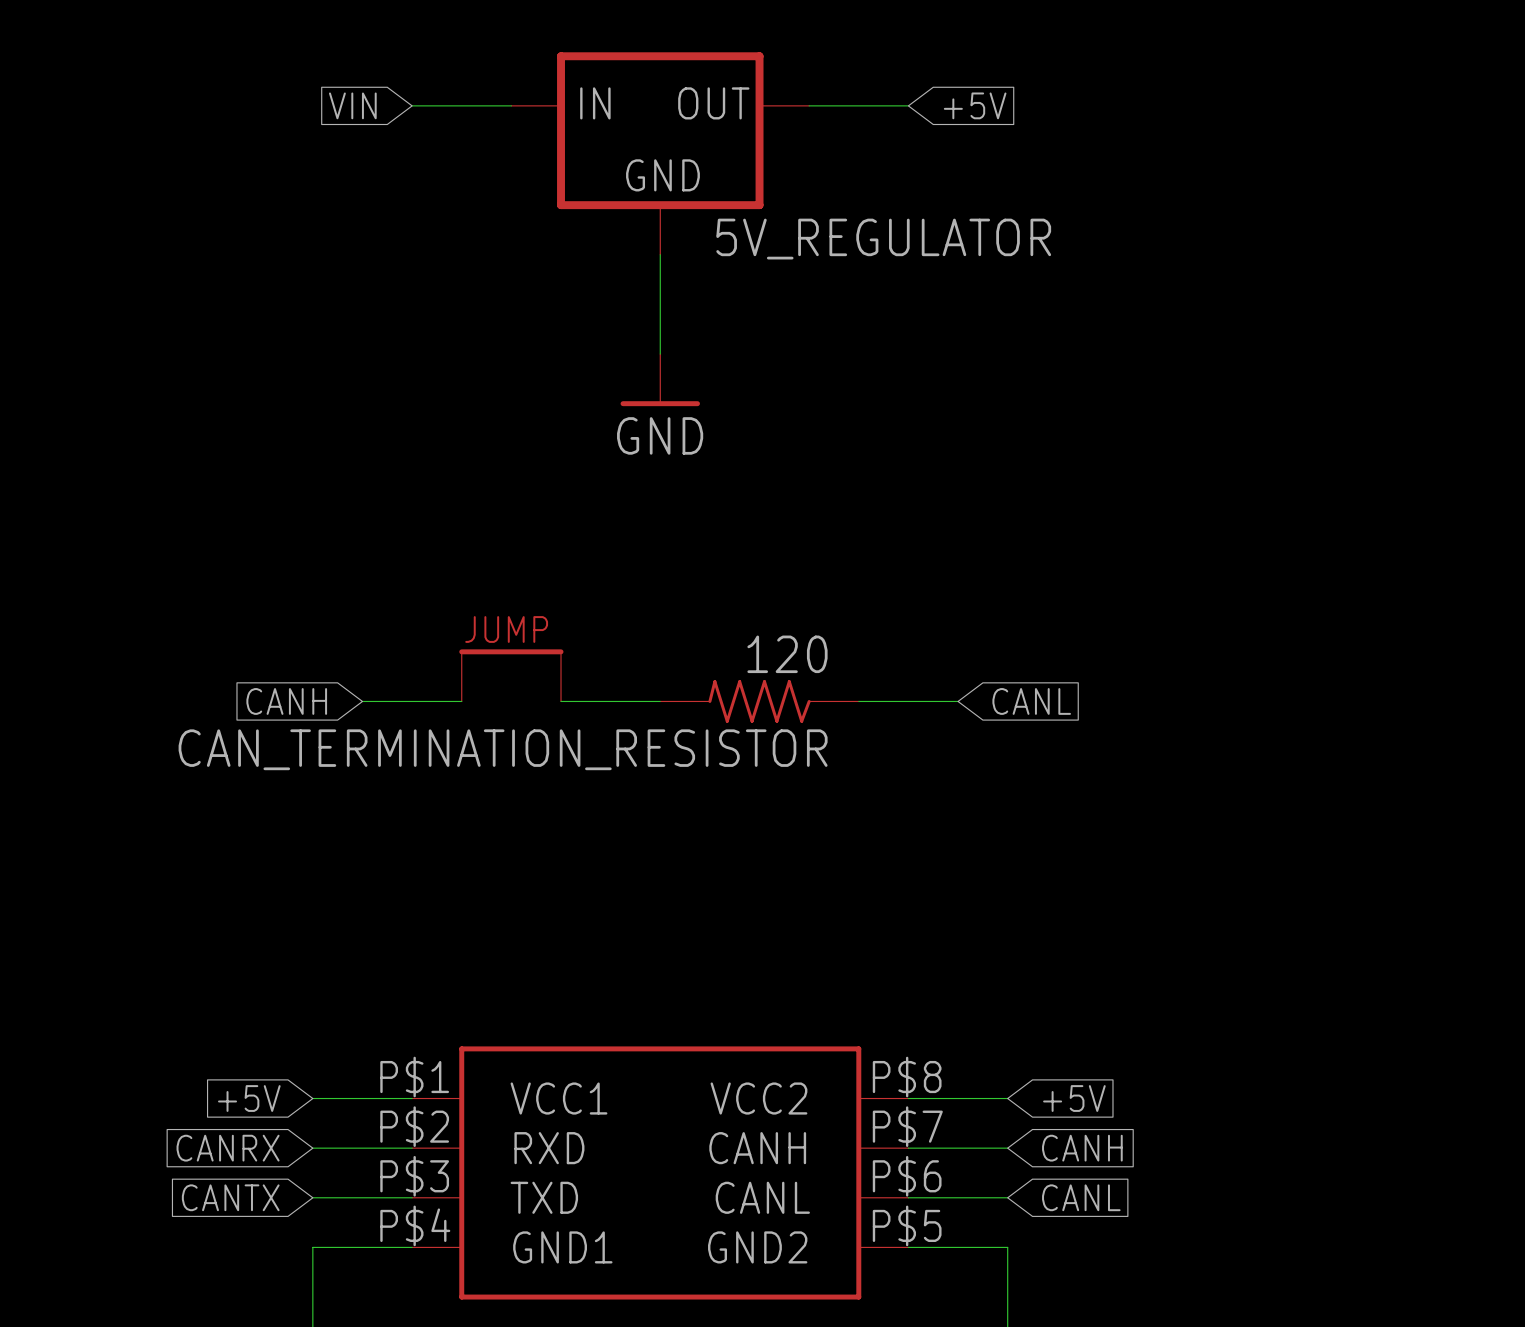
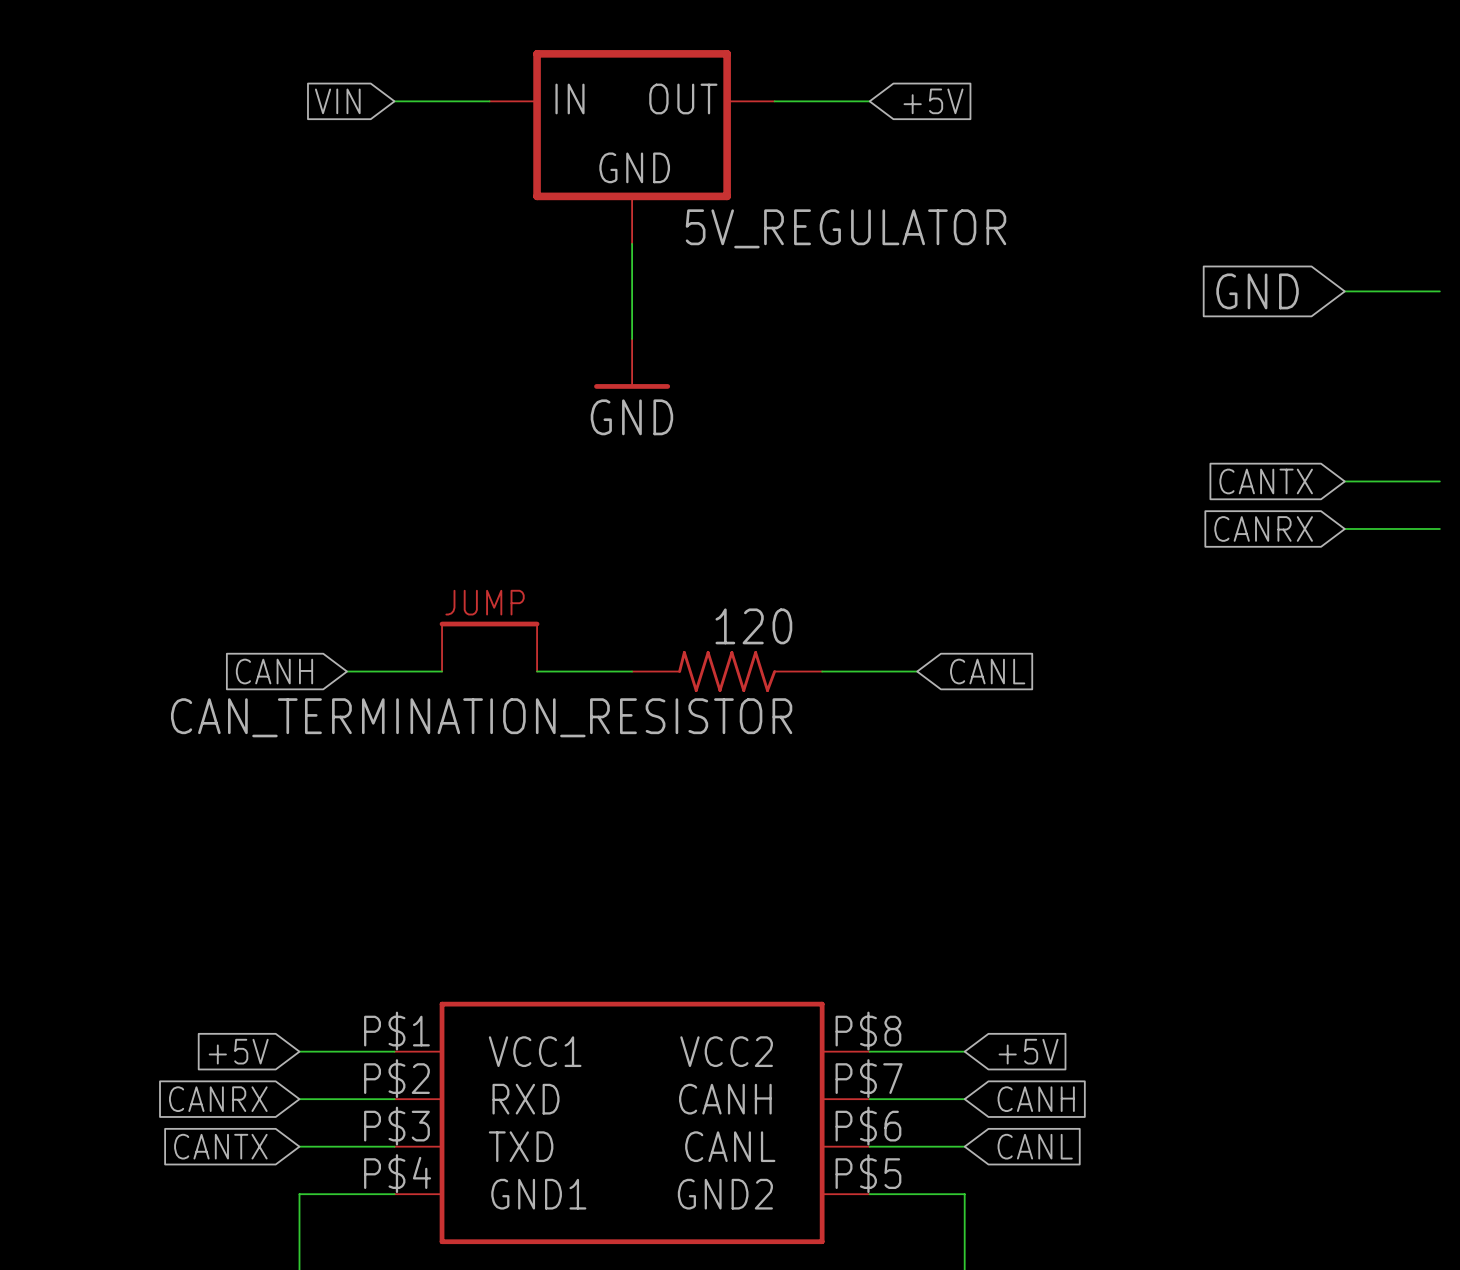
global label: none -> GND (1257, 291)
wire: none -> (1344, 291) (1439, 291)
global label: none -> CANTX (1266, 481)
wire: none -> (1344, 481) (1439, 481)
global label: none -> CANRX (1263, 528)
wire: none -> (1344, 528) (1439, 528)

